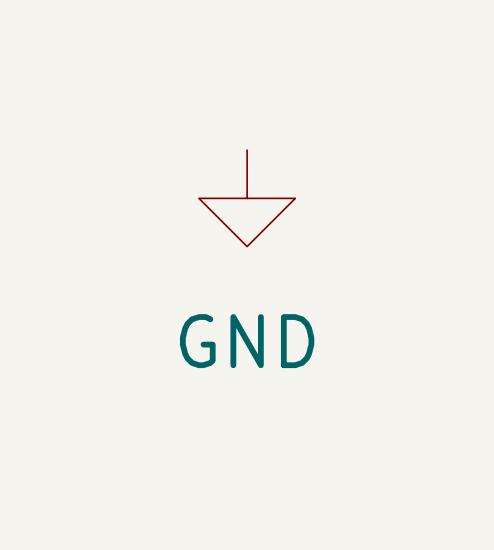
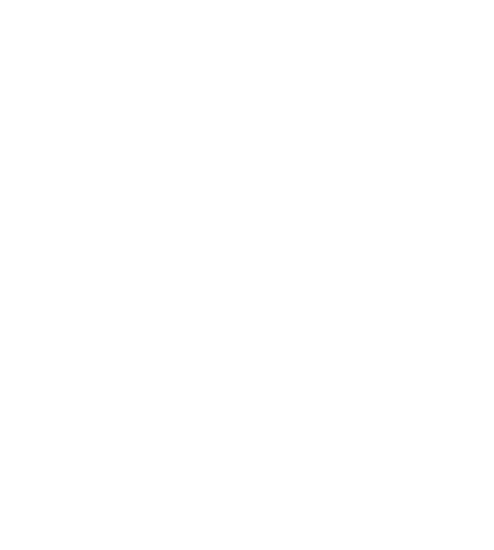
power symbol: GND (247, 198) -> none

